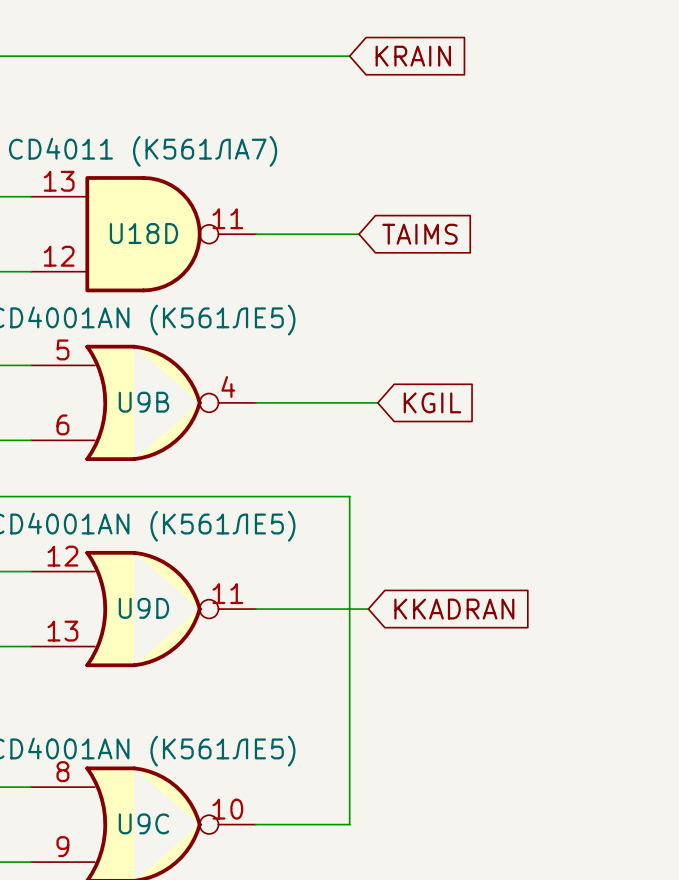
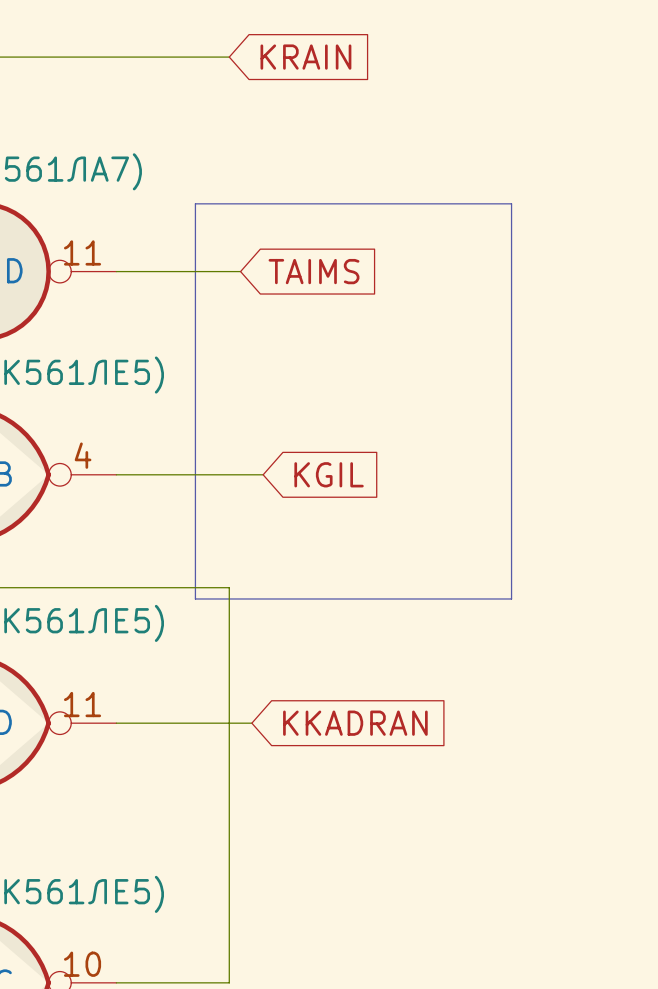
line: none -> (195, 203) (511, 203) (511, 598) (195, 598) (195, 203)

